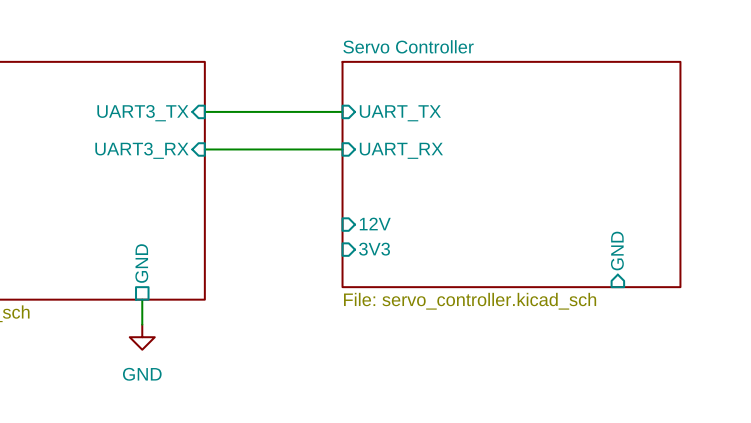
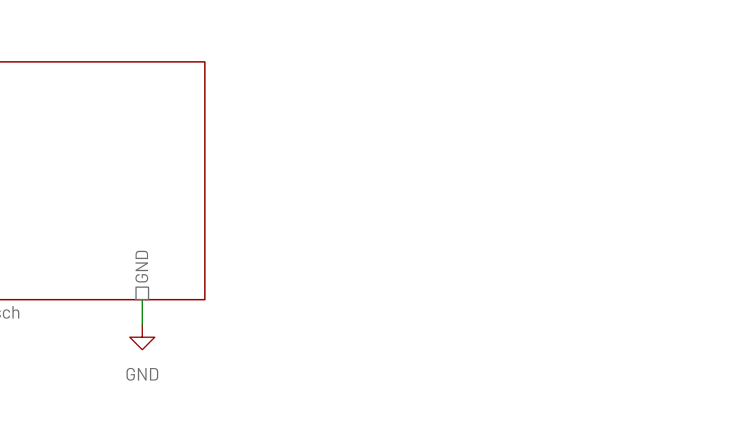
wire: (204, 111) (342, 111) -> none
sheet pin: UART3_TX (142, 113) -> none
sheet pin: UART_TX (400, 113) -> none
wire: (204, 149) (342, 149) -> none
sheet pin: UART3_RX (141, 150) -> none
sheet pin: UART_RX (401, 150) -> none
sheet Servo Controller: File: servo_controller.kicad_sch (511, 174) -> none
sheet pin: 12V (375, 224) -> none
sheet pin: 3V3 (374, 249) -> none
sheet pin: GND (617, 251) -> none

